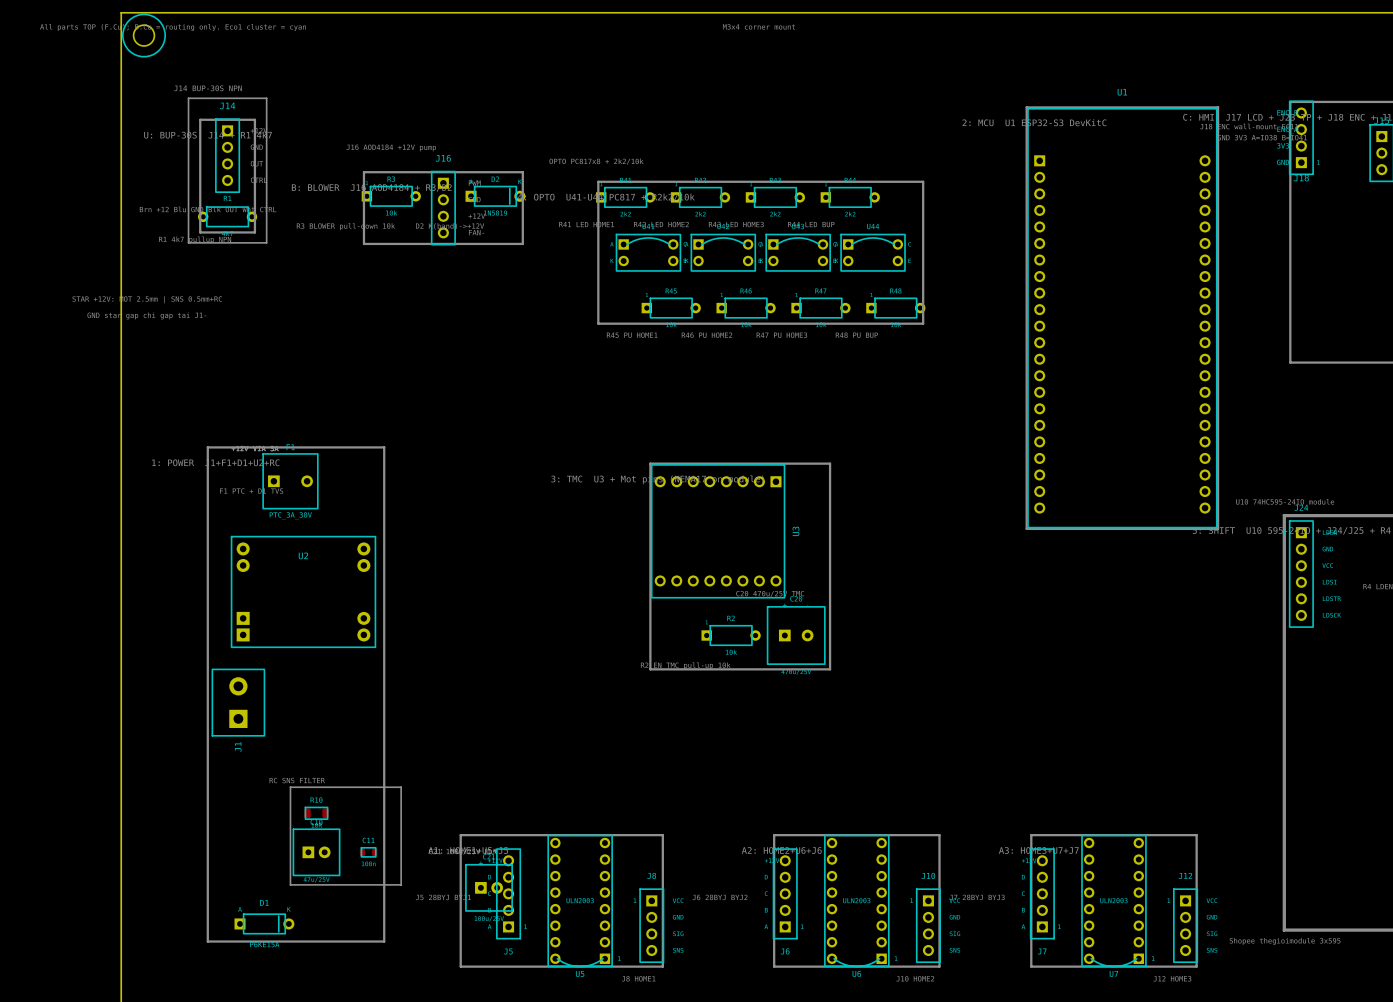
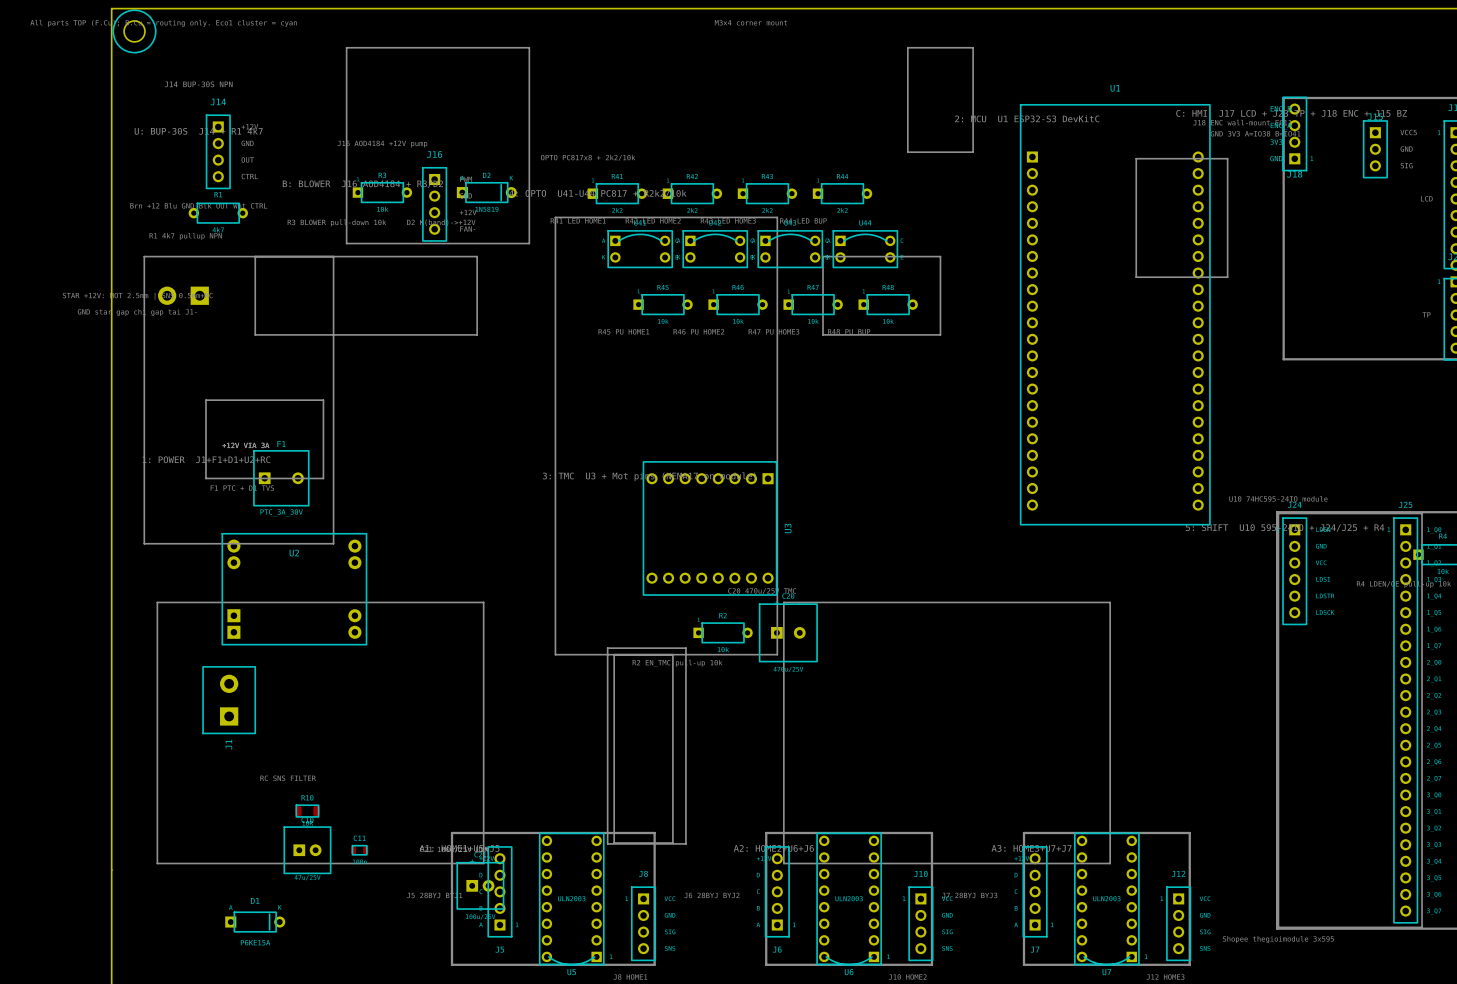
line: none -> (346, 47) (529, 47) (529, 243) (346, 243) (346, 47)
line: none -> (907, 47) (973, 47) (973, 152) (907, 152) (907, 47)
line: (188, 98) (266, 98) (266, 242) (188, 242) (188, 98) -> none
line: (1026, 107) (1218, 107) (1218, 528) (1026, 528) (1026, 107) -> none
line: (200, 119) (254, 119) (254, 232) (200, 232) (200, 119) -> none
line: none -> (1136, 158) (1227, 158) (1227, 277) (1136, 277) (1136, 158)
line: (363, 172) (522, 172) (522, 243) (363, 243) (363, 172) -> none
line: (598, 181) (923, 181) (923, 323) (598, 323) (598, 181) -> none
line: none -> (555, 217) (777, 217) (777, 654) (555, 654) (555, 217)
line: none -> (255, 256) (255, 334) (477, 334) (477, 256) (144, 256) (144, 543) (333, 543) (333, 256)
line: none -> (823, 256) (940, 256) (940, 334) (823, 334) (823, 256)
part: none -> (183, 295)
line: none -> (205, 400) (323, 400) (323, 478) (205, 478) (205, 400)
line: (207, 447) (384, 447) (384, 941) (207, 941) (207, 447) -> none
line: (650, 463) (830, 463) (830, 669) (650, 669) (650, 463) -> none
line: none -> (157, 602) (483, 602) (483, 863) (157, 863) (157, 602)
line: none -> (783, 602) (1110, 602) (1110, 863) (783, 863) (783, 602)
line: none -> (607, 648) (685, 648) (685, 843) (607, 843) (607, 648)
line: none -> (614, 654) (614, 843) (672, 843) (672, 654)
line: (290, 787) (401, 787) (401, 884) (290, 884) (290, 787) -> none

